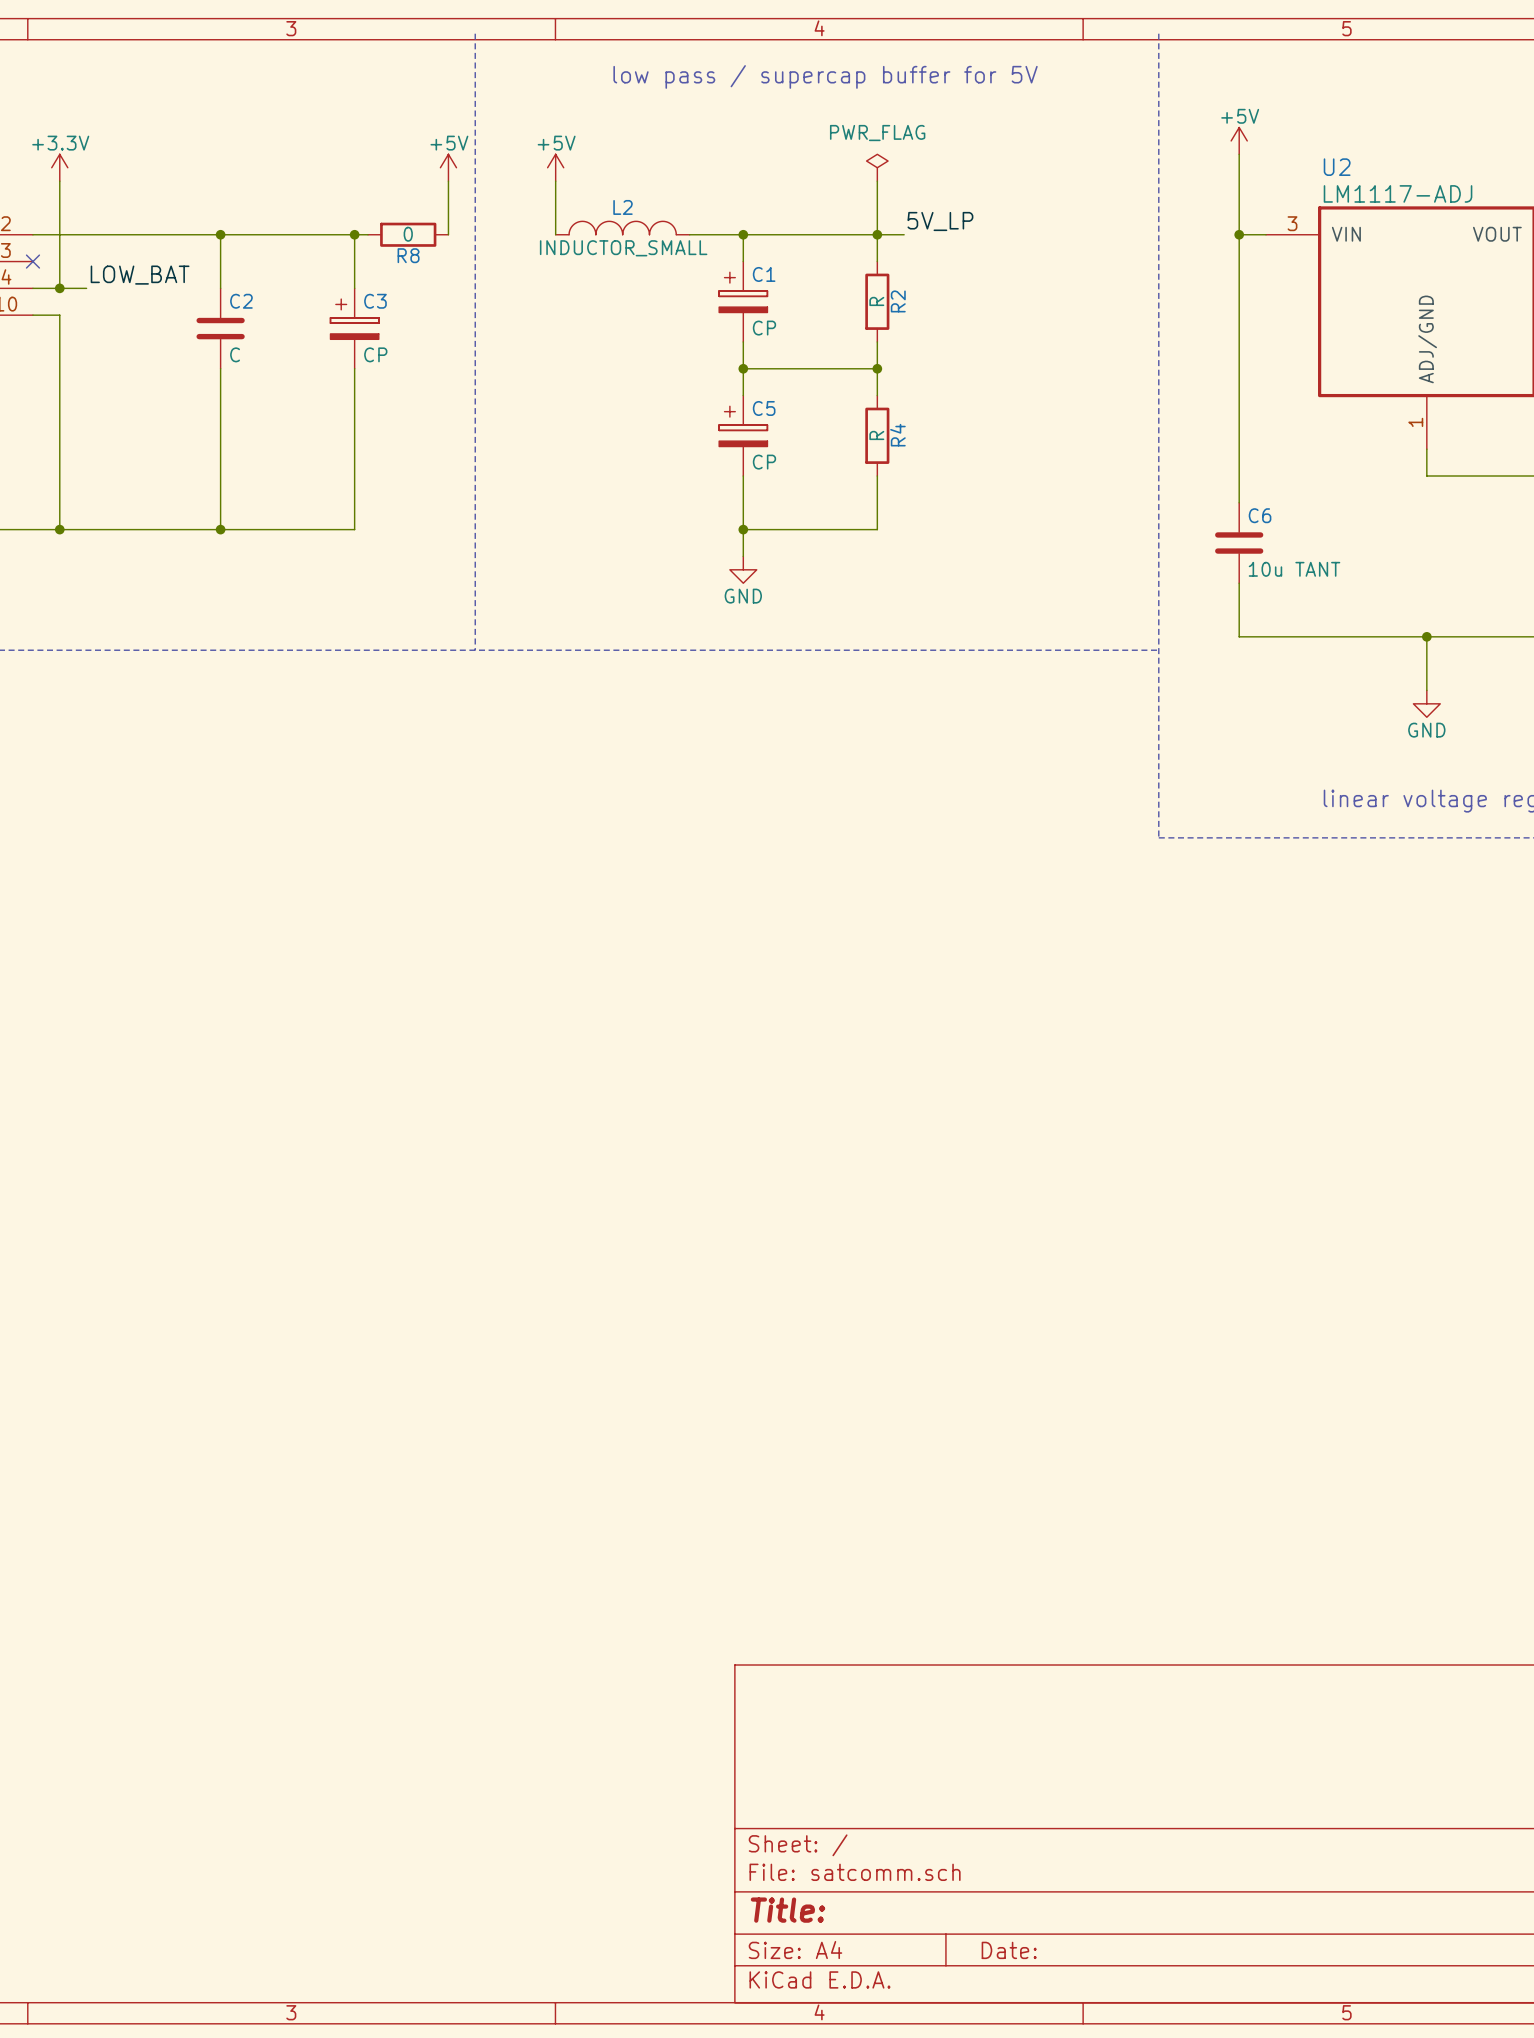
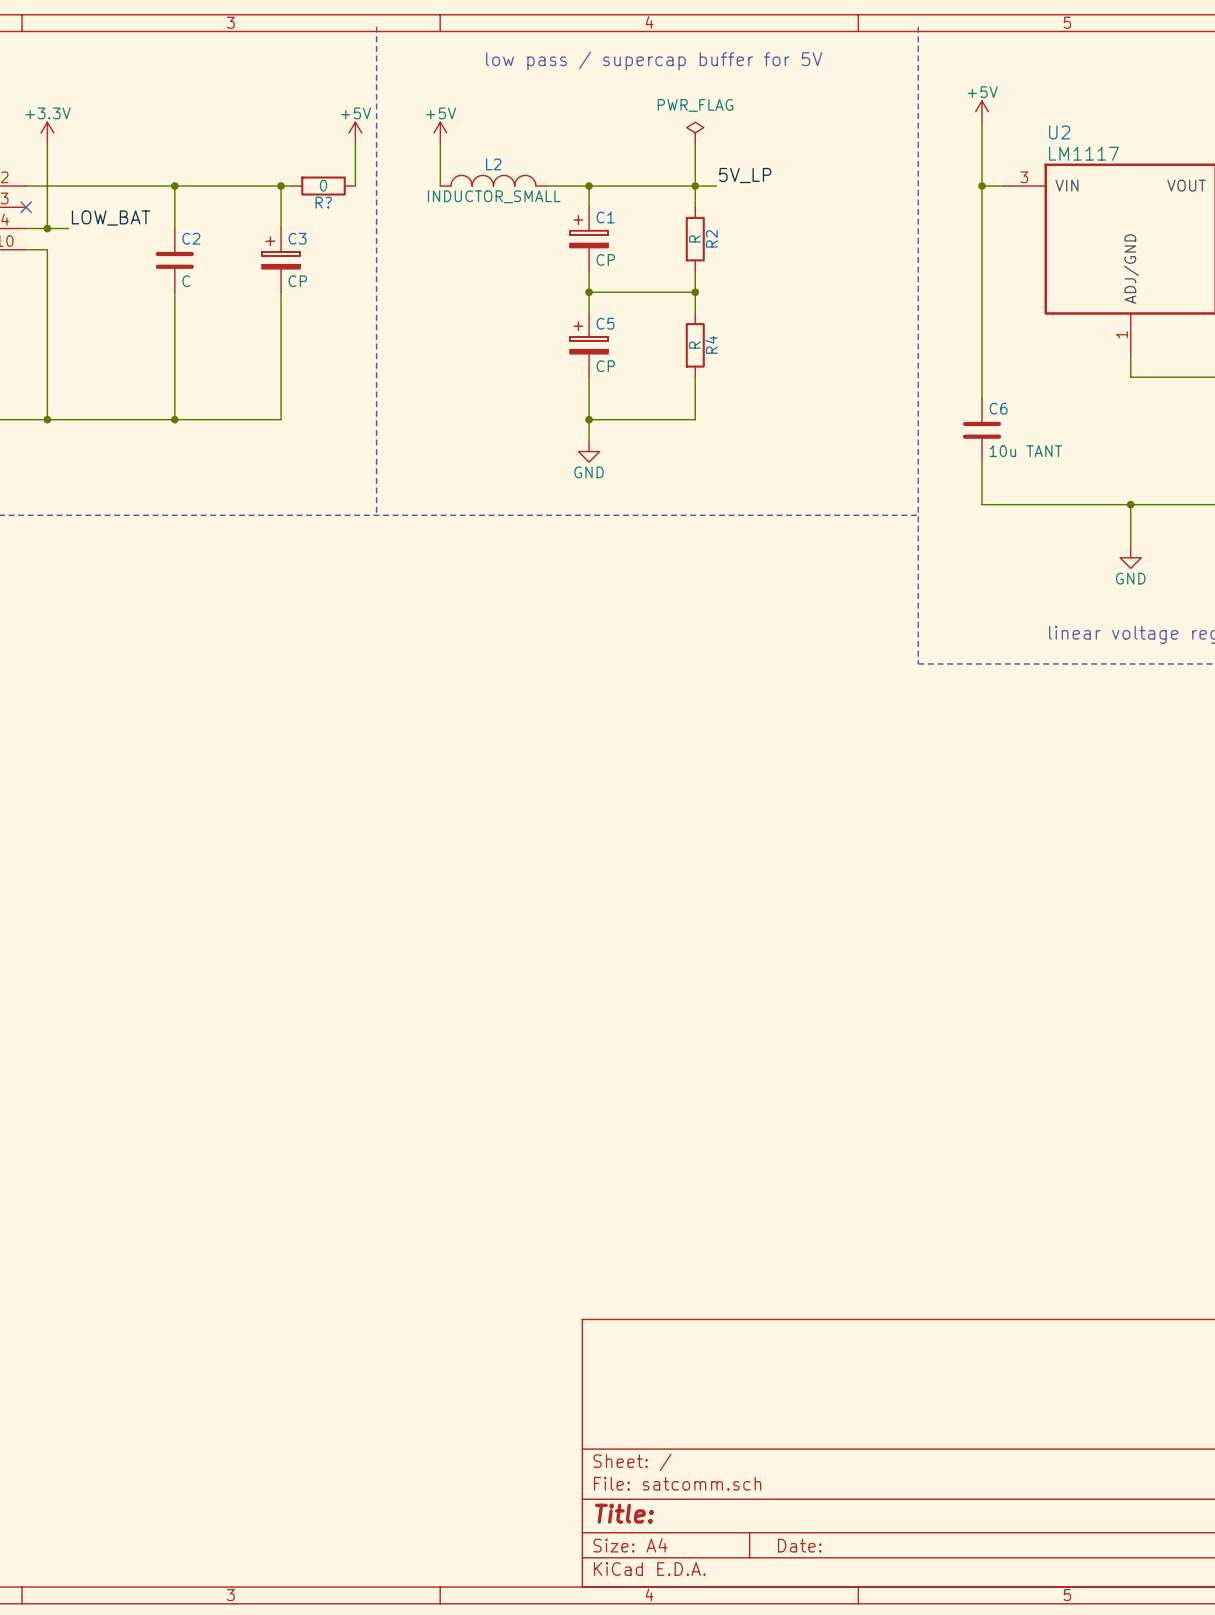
U2 value: LM1117-ADJ (1398, 193) -> LM1117 (1083, 153)
R8 name: R8 (408, 255) -> R? (323, 202)

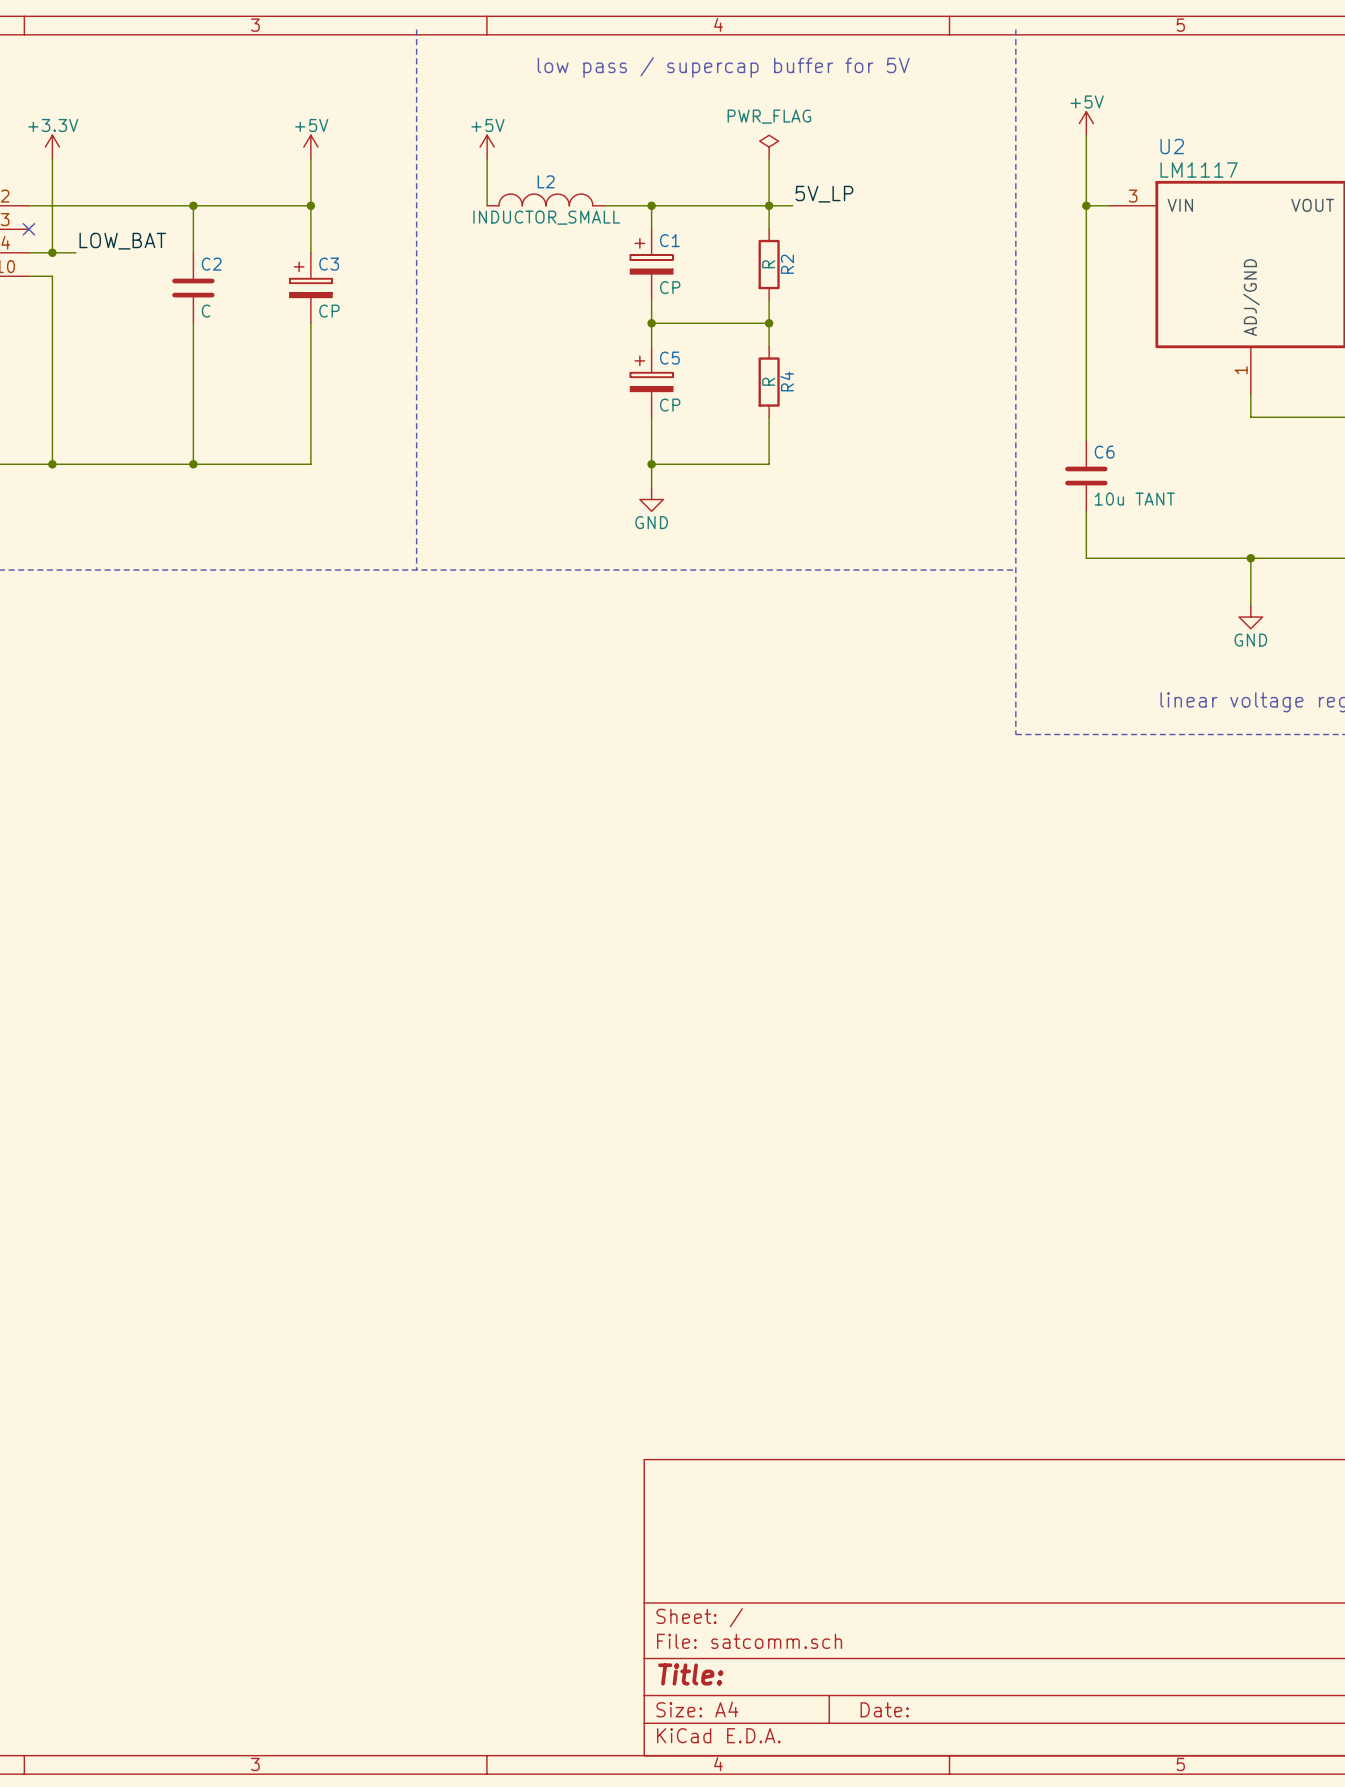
power symbol position: +5V (355, 132) -> +5V (310, 147)
wire: (355, 143) (355, 186) -> none
wire: (281, 186) (291, 186) -> (310, 205) (310, 158)
R?: 0 (323, 186) -> none

